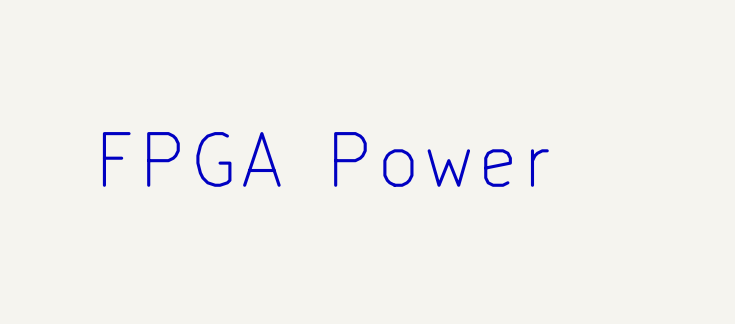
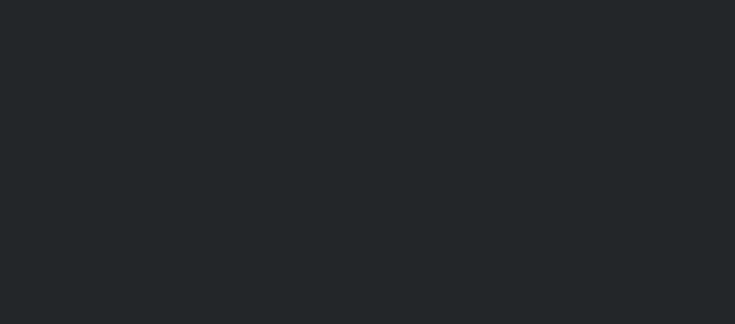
text: FPGA Power (325, 159) -> none

